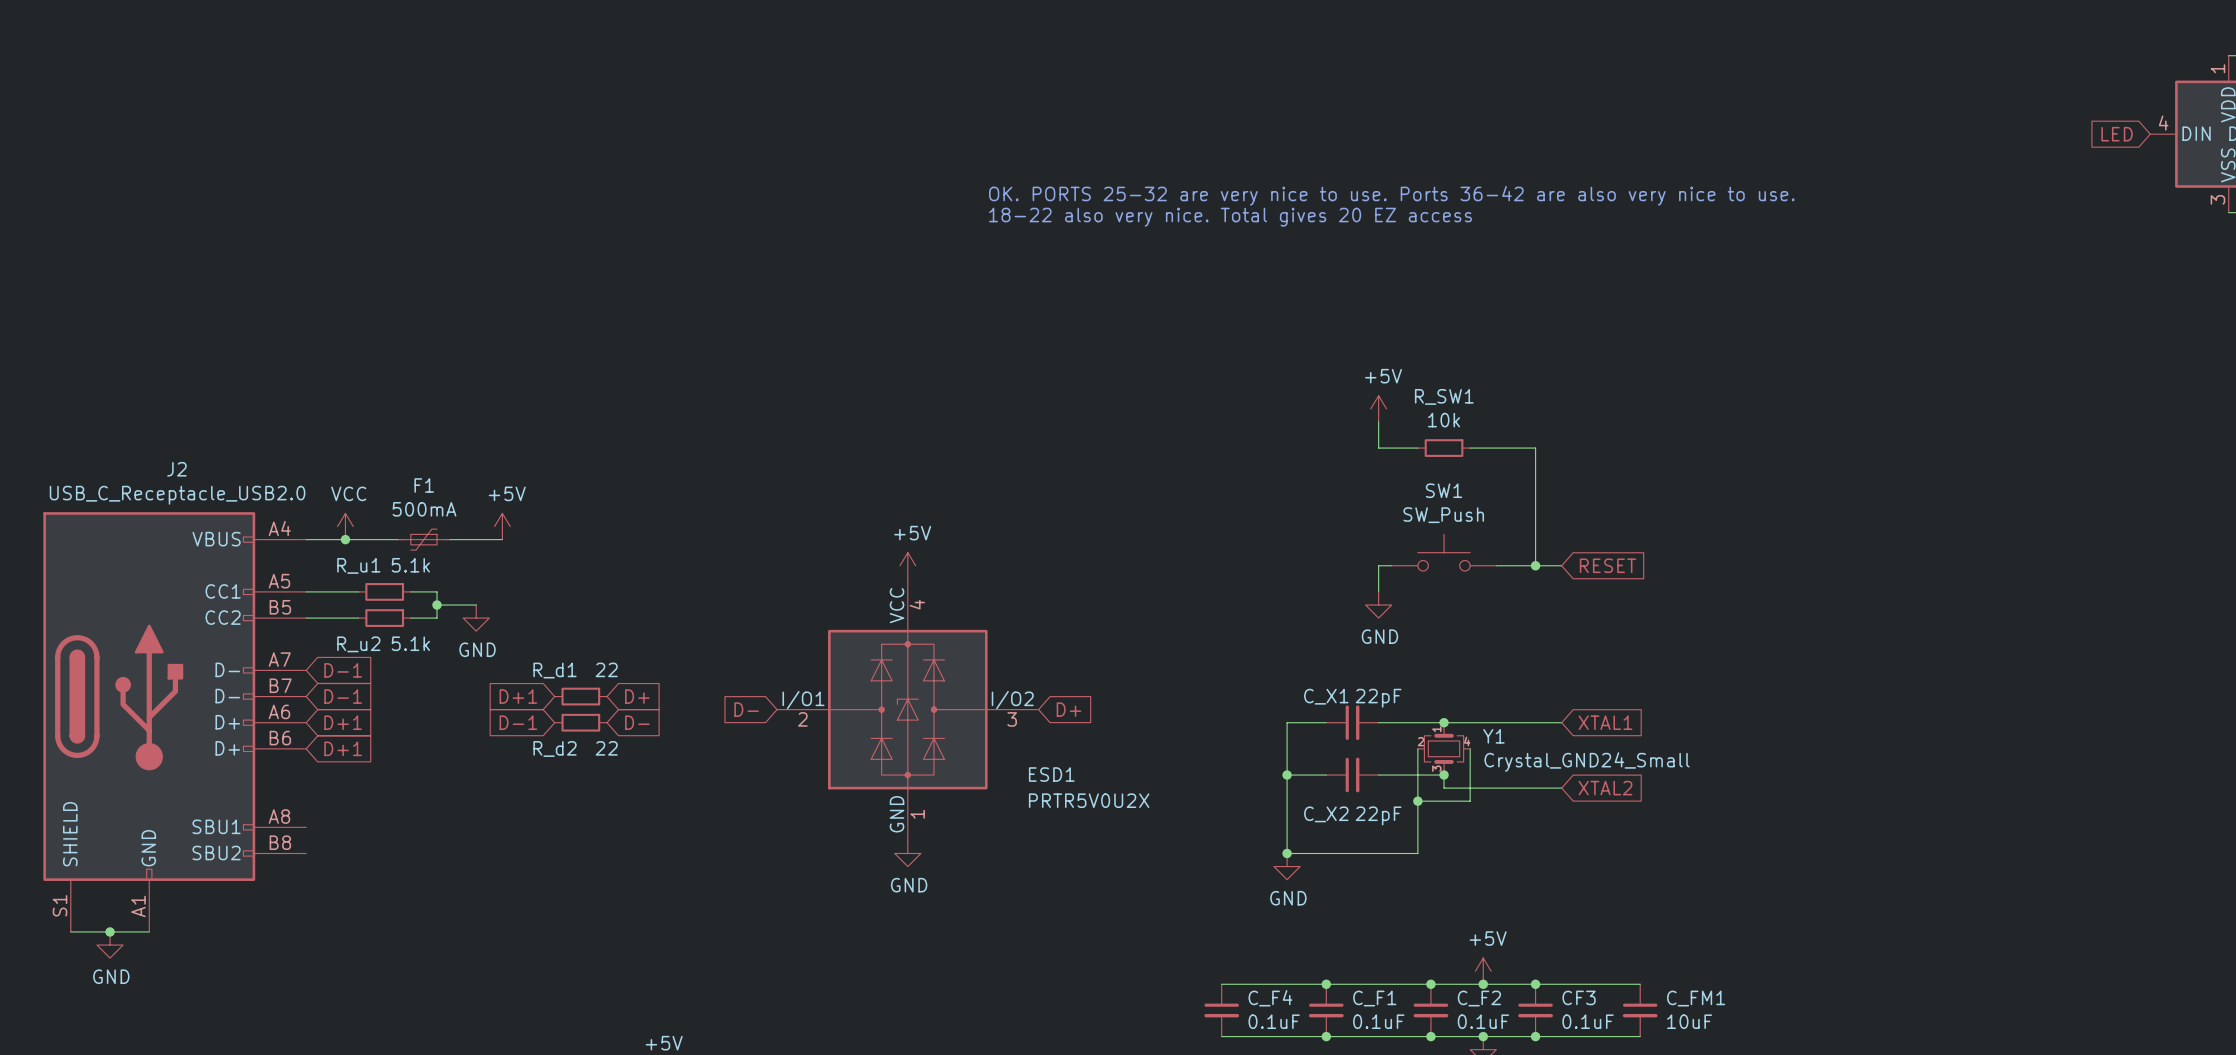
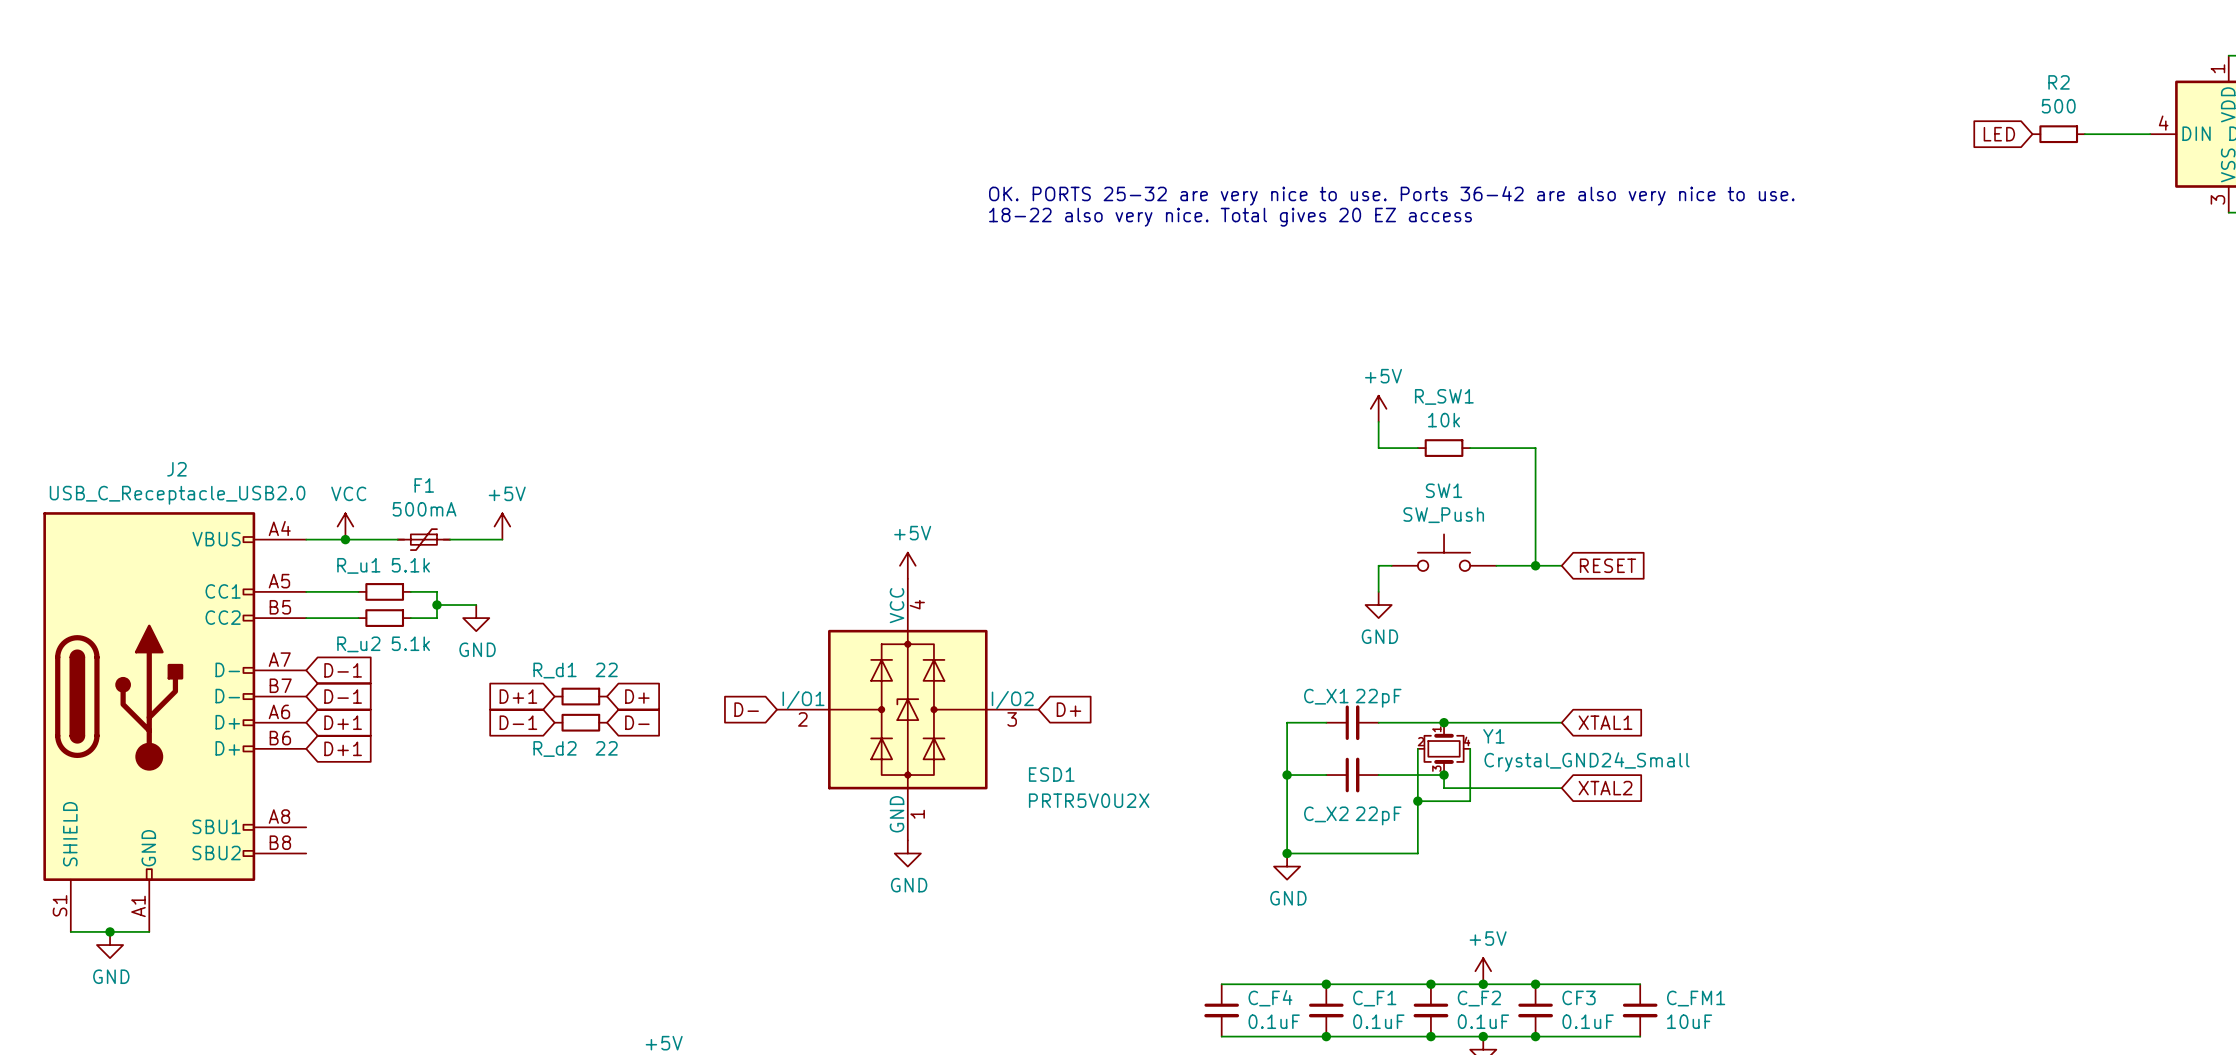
R2: none -> 500 (2058, 134)
wire: none -> (2084, 134) (2150, 134)
global label position: LED (2117, 134) -> LED (1999, 134)

